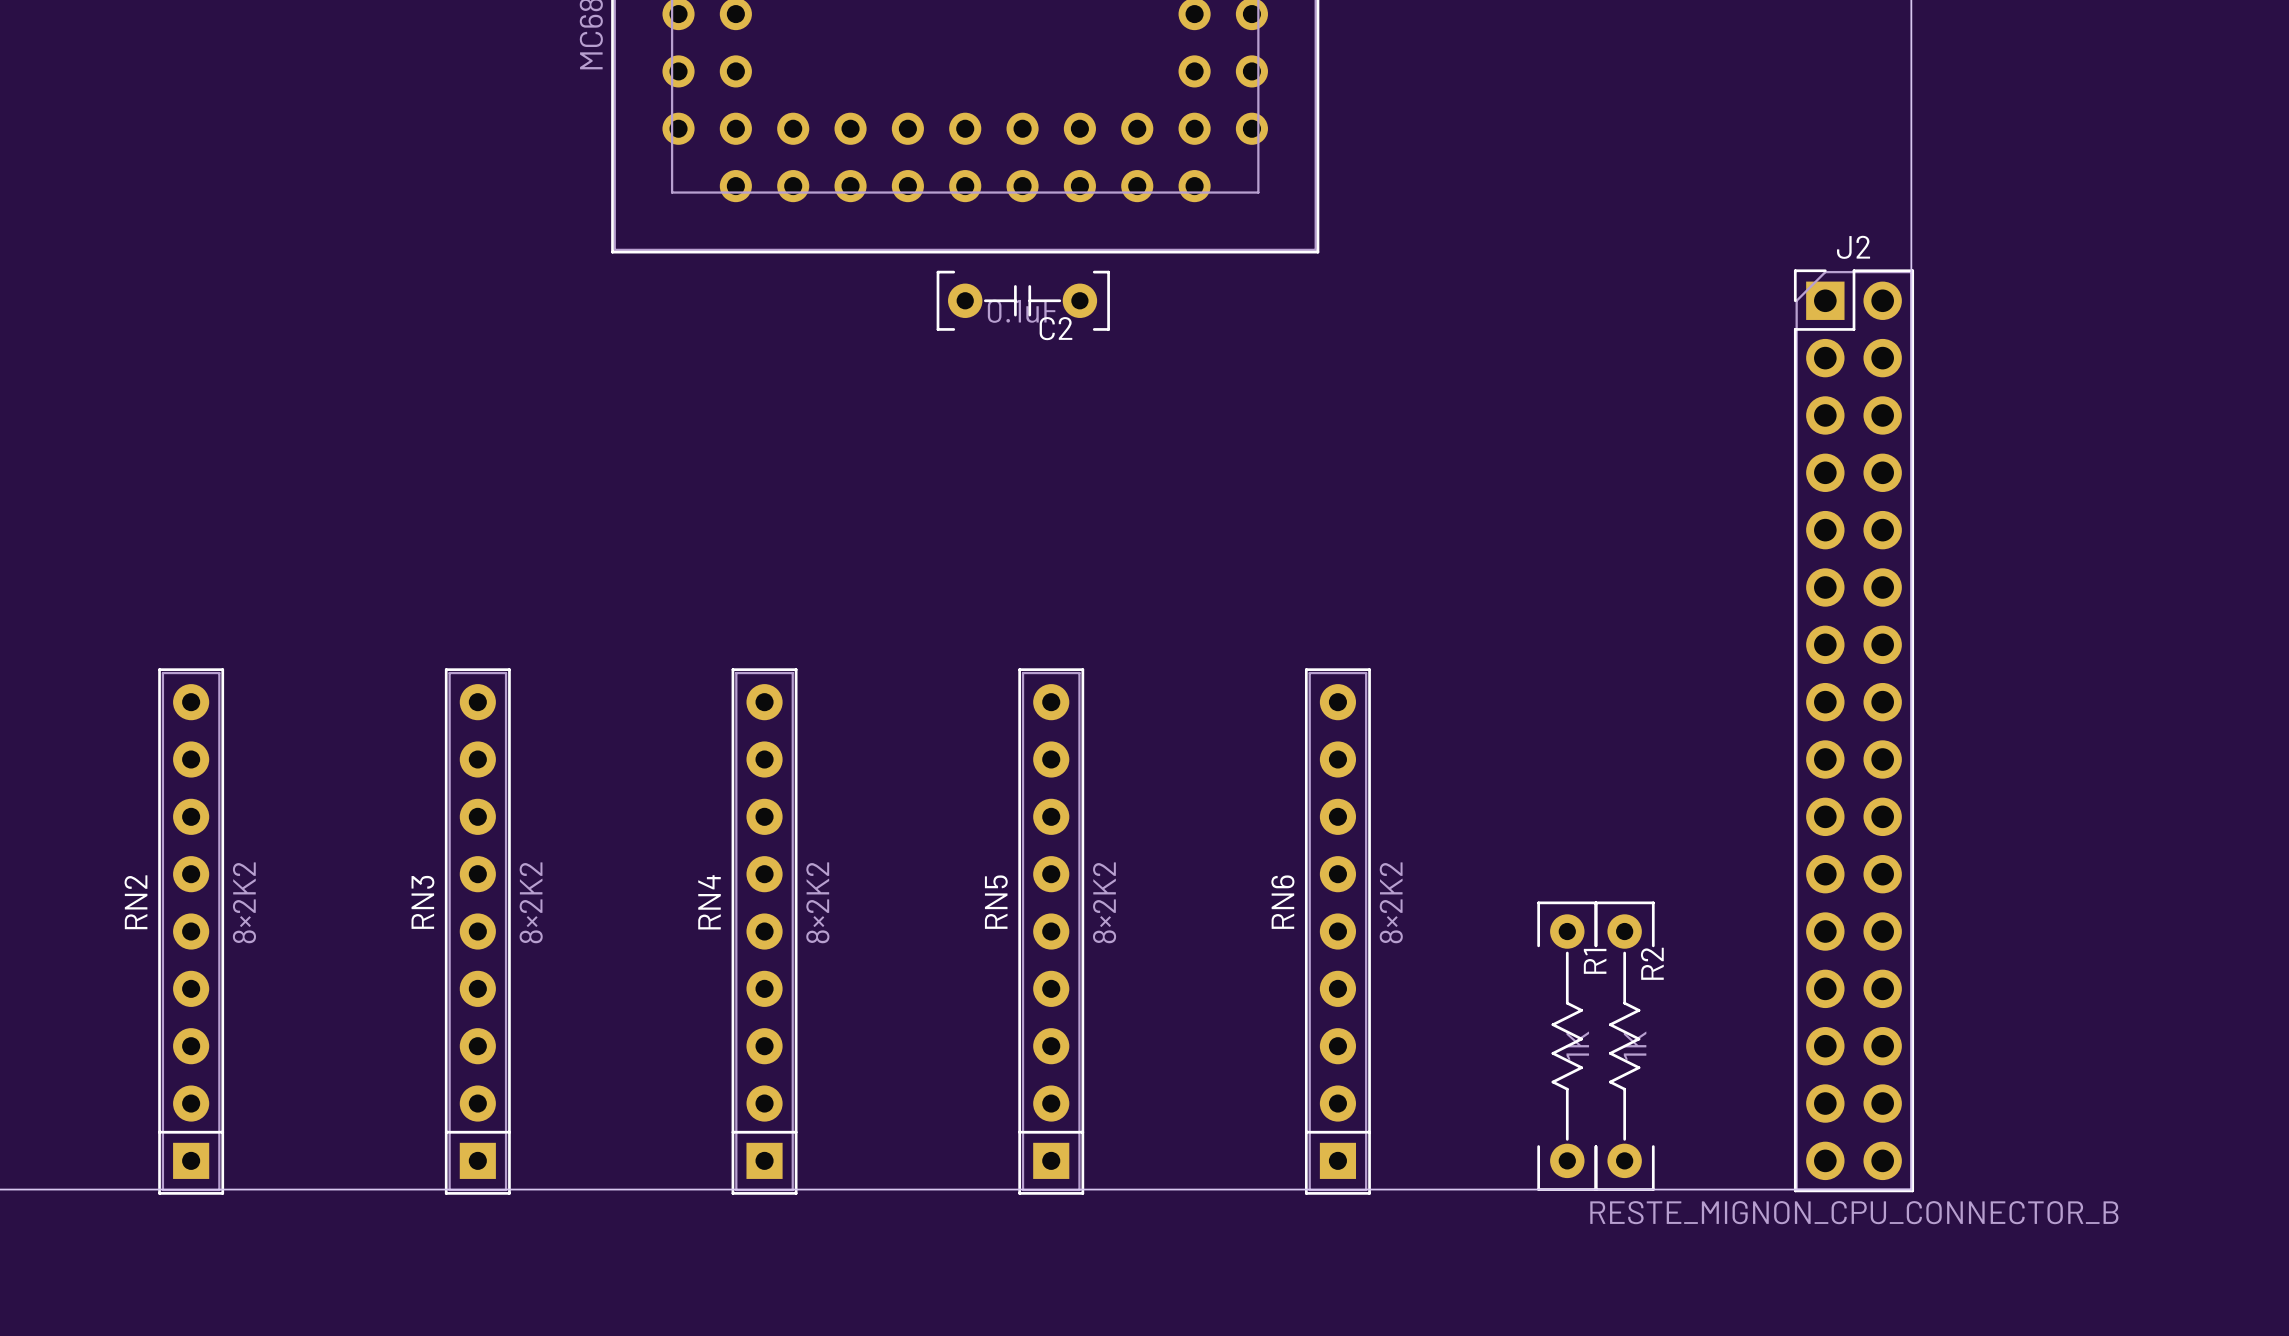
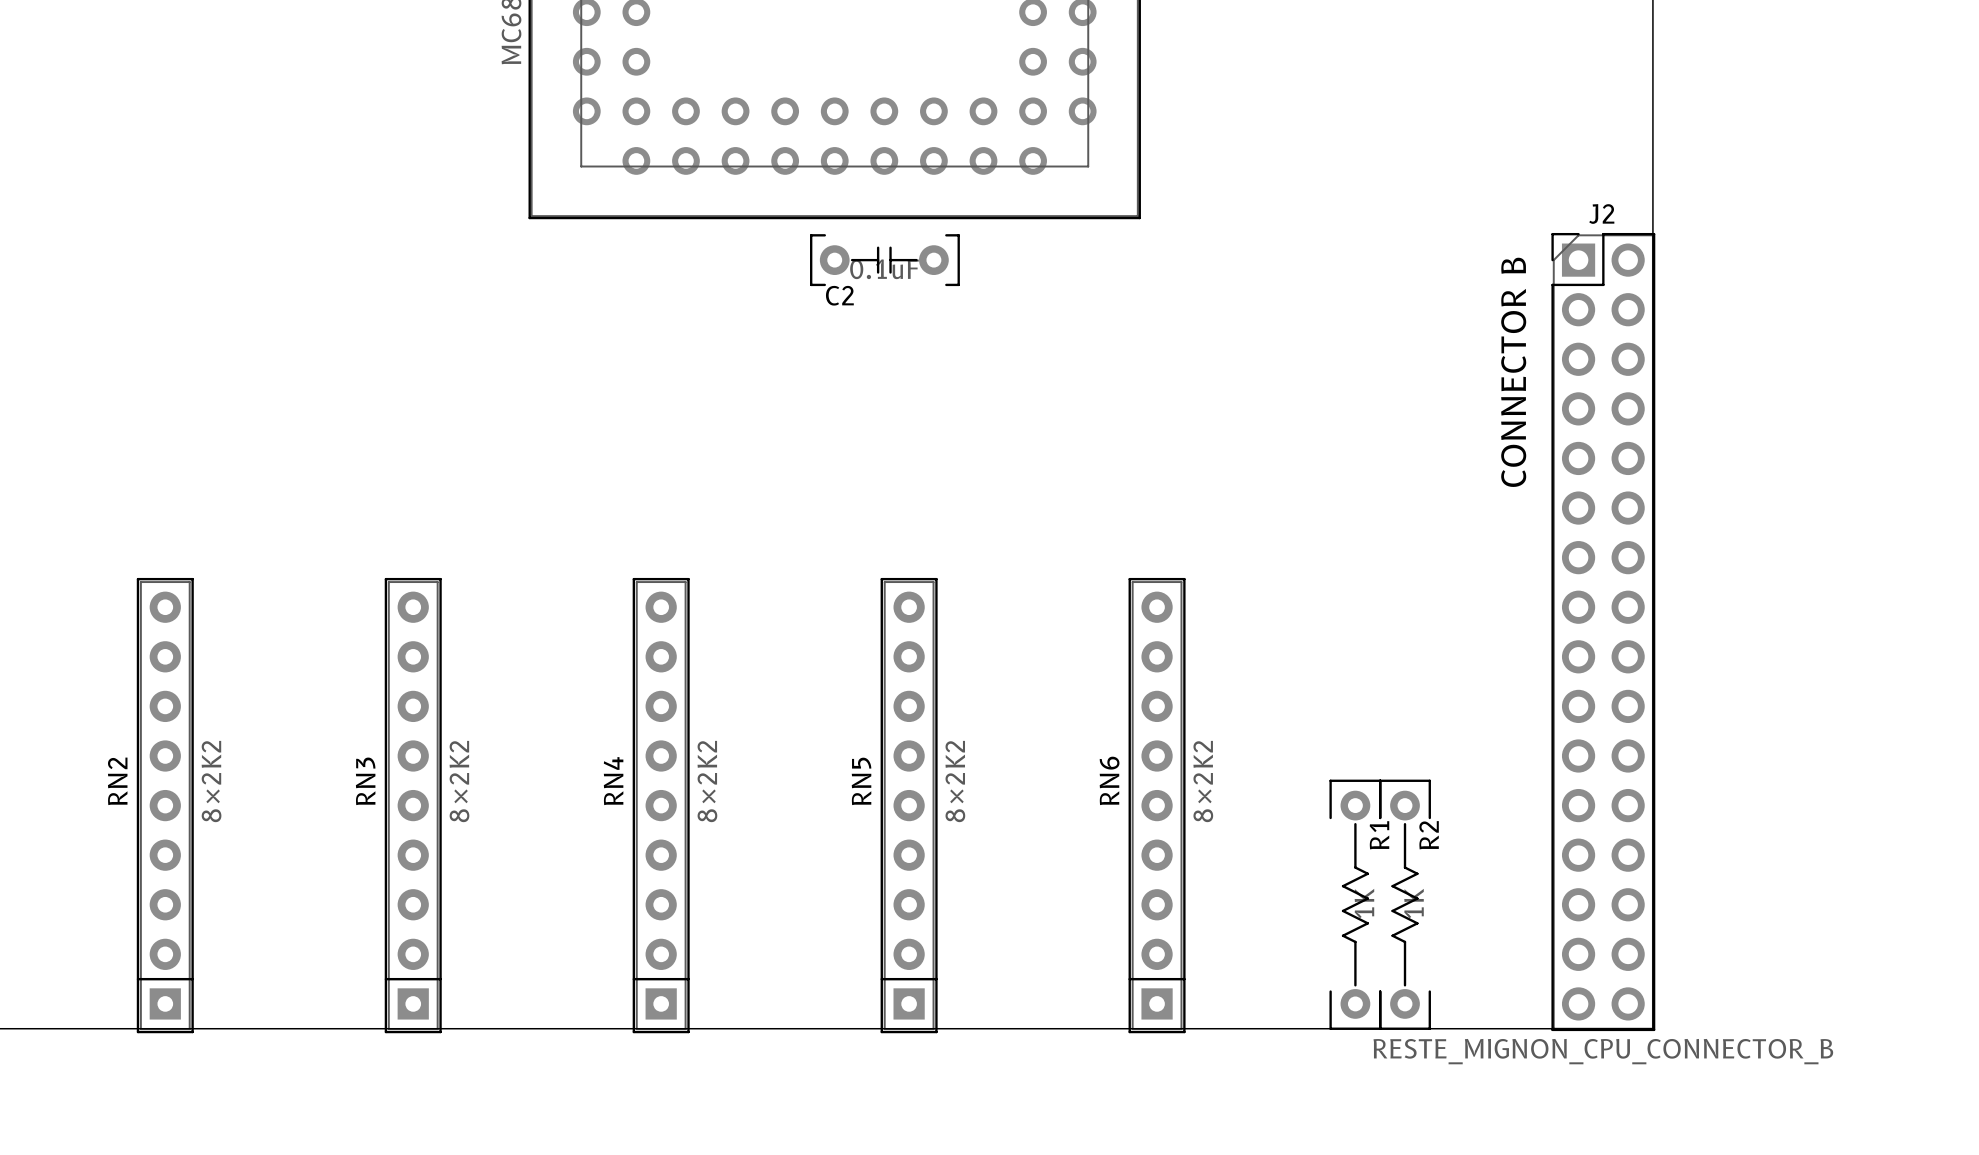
C2 name position: C2 (1055, 328) -> C2 (839, 295)
text: none -> CONNECTOR B (1513, 372)

